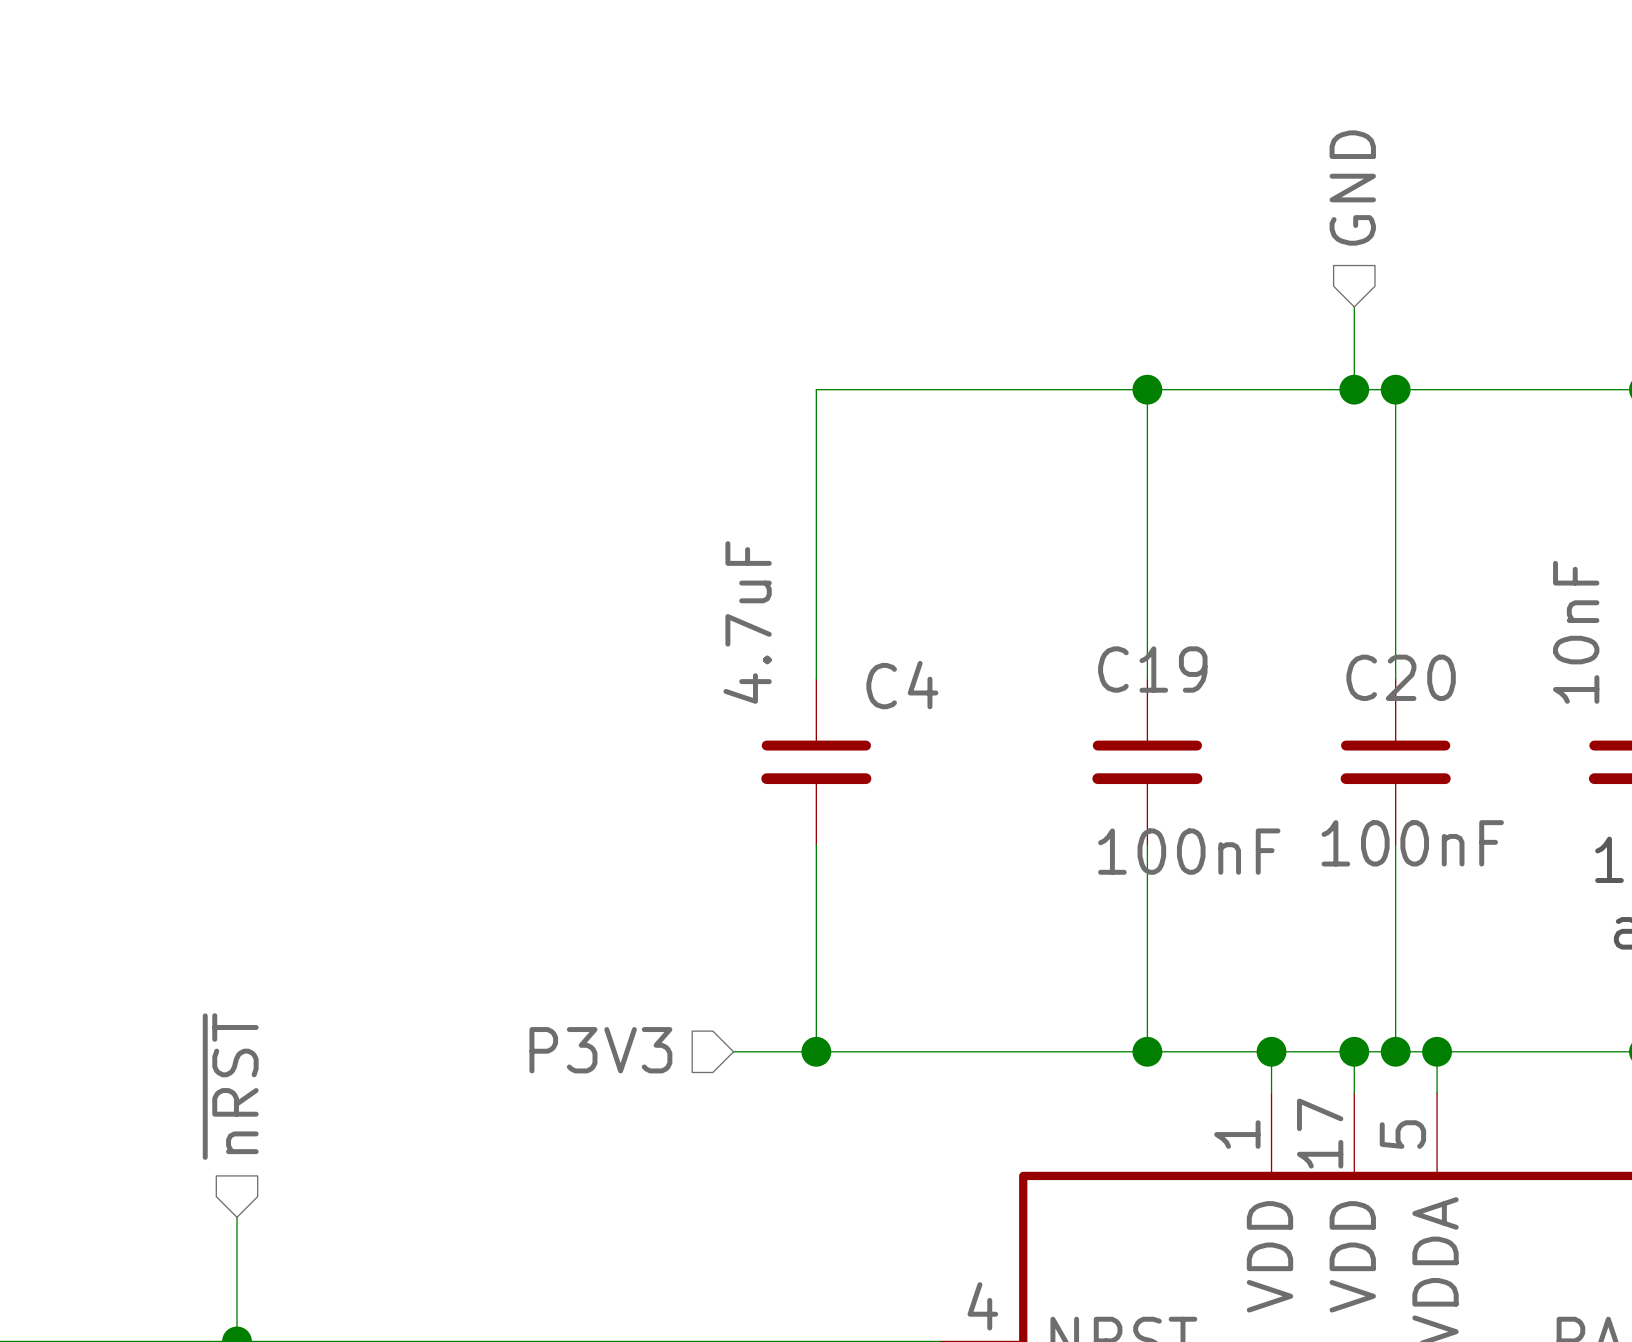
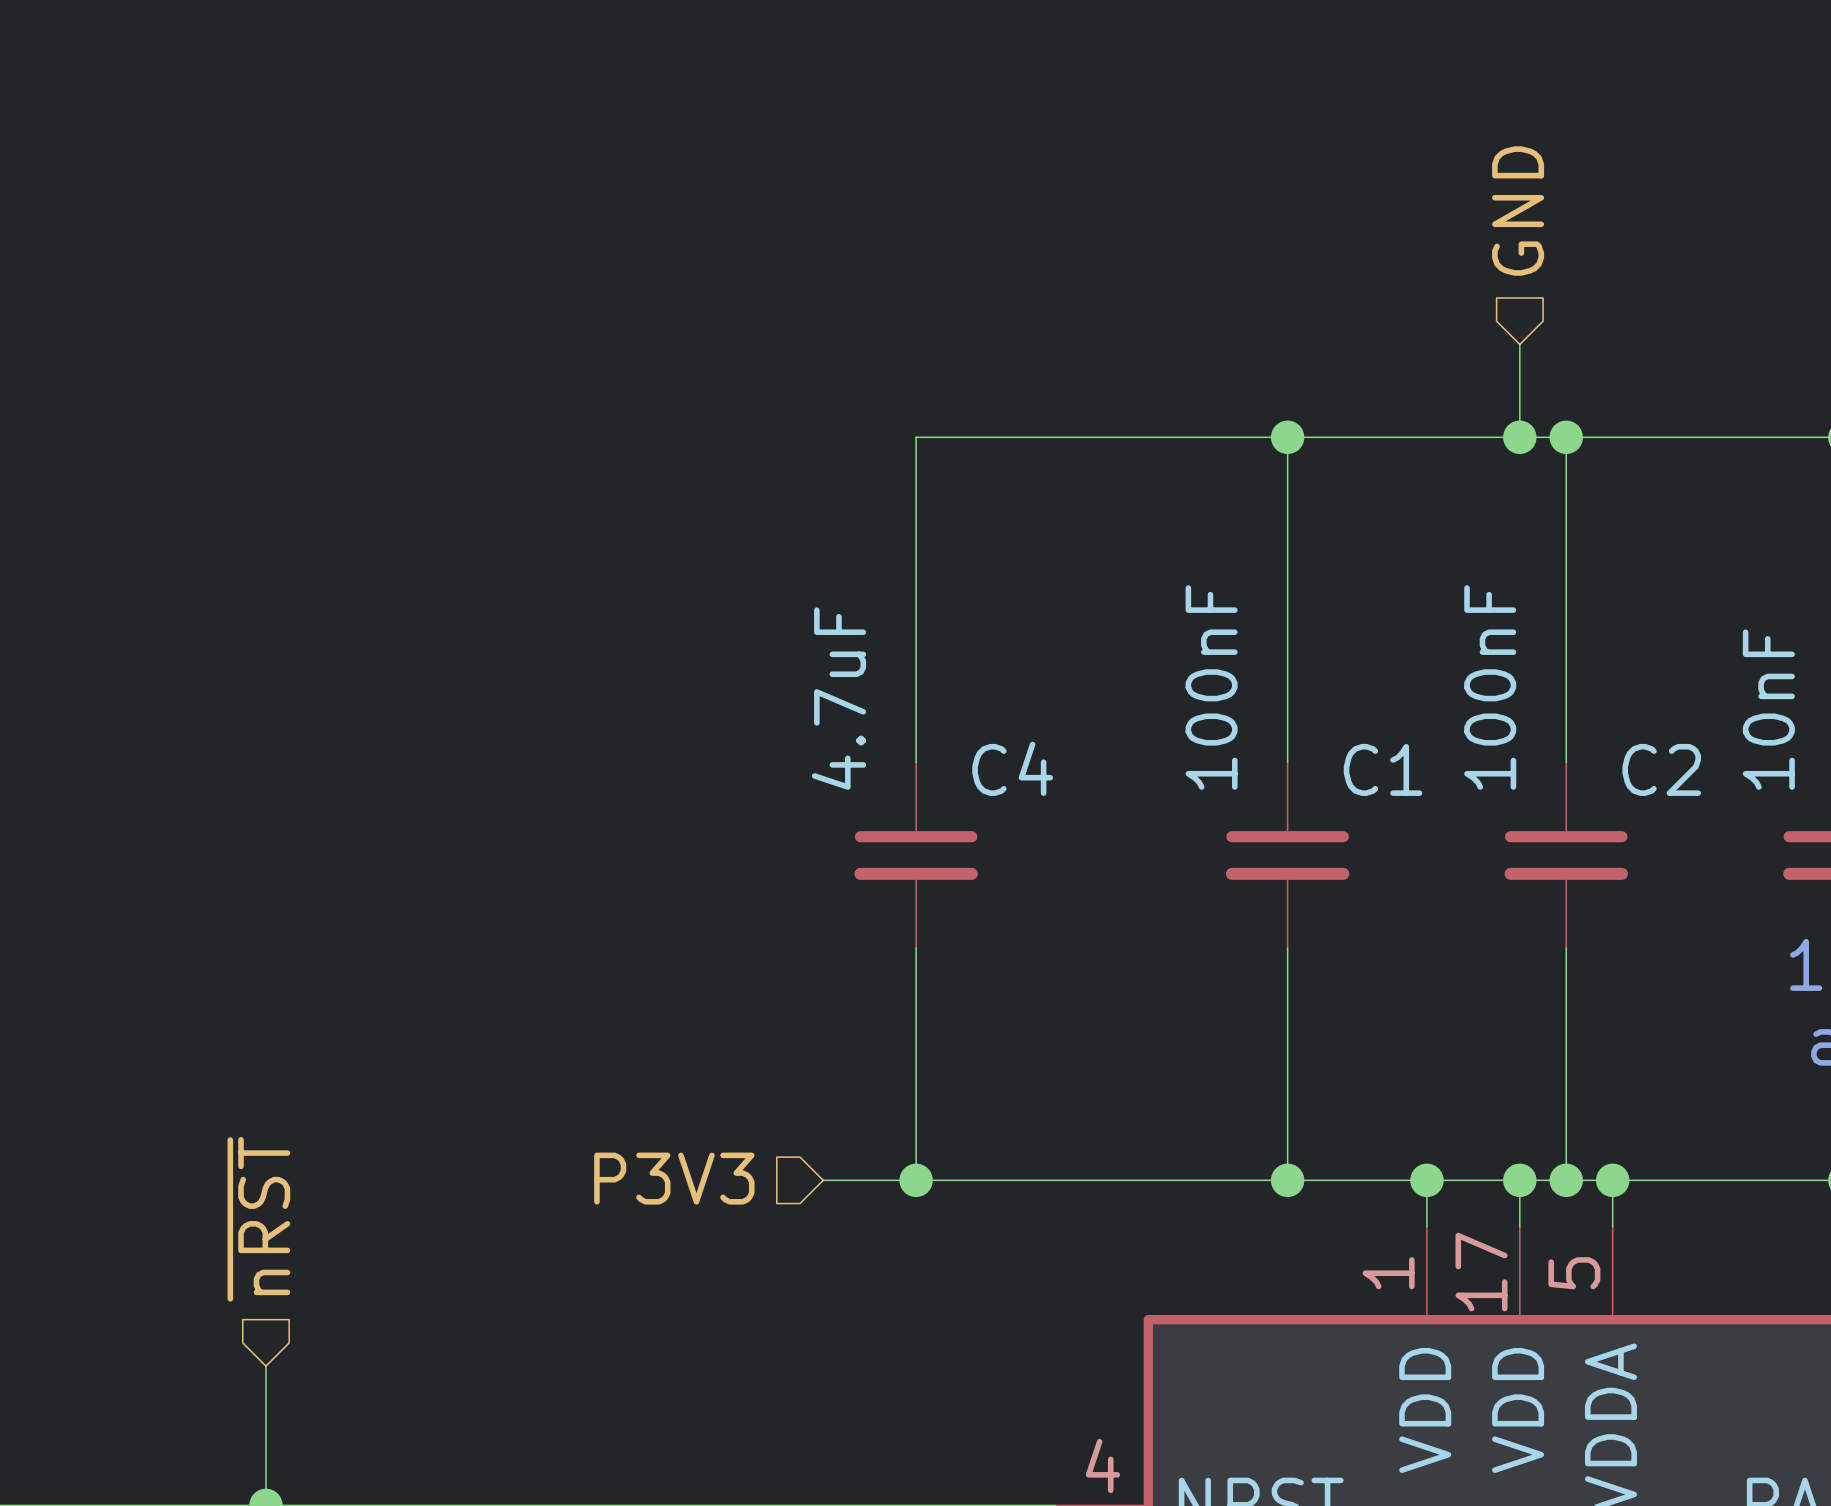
C19 name: C19 (1152, 669) -> C1 (1383, 769)
C20 name: C20 (1401, 677) -> C2 (1661, 769)
C20 value rotation: 0° (1412, 843) -> 90° counterclockwise (1490, 687)
C20 value position: 100nF (1412, 843) -> 100nF (1490, 687)
C19 value rotation: 0° (1189, 851) -> 90° counterclockwise (1211, 687)
C19 value position: 100nF (1189, 851) -> 100nF (1211, 687)

